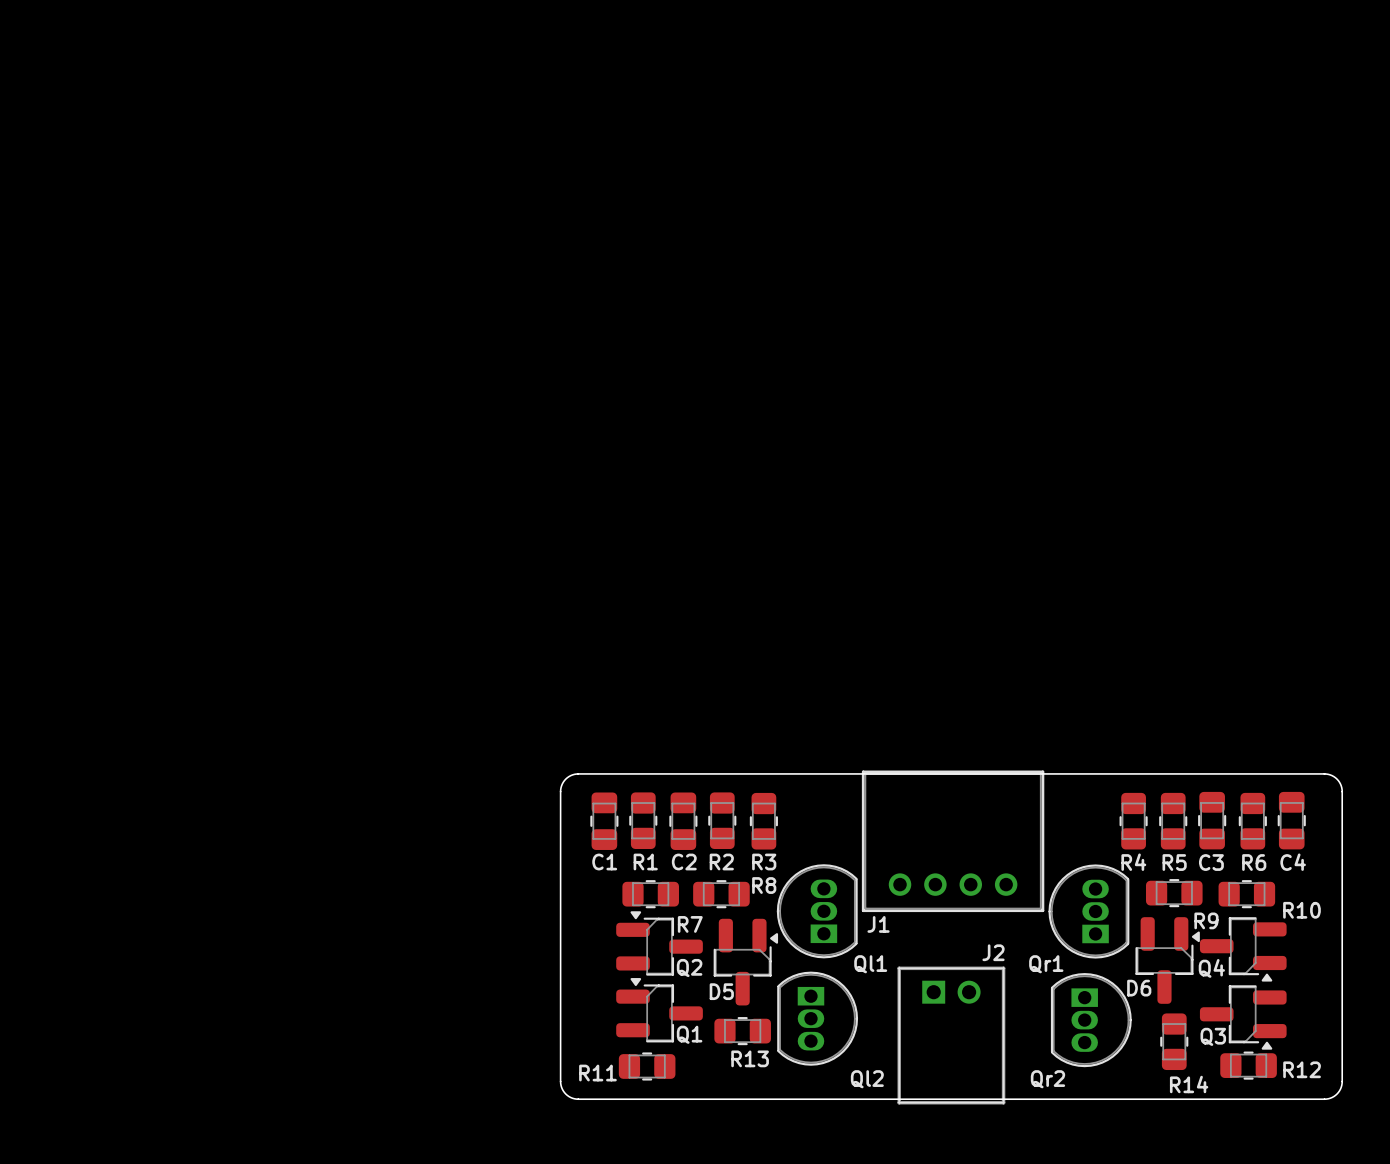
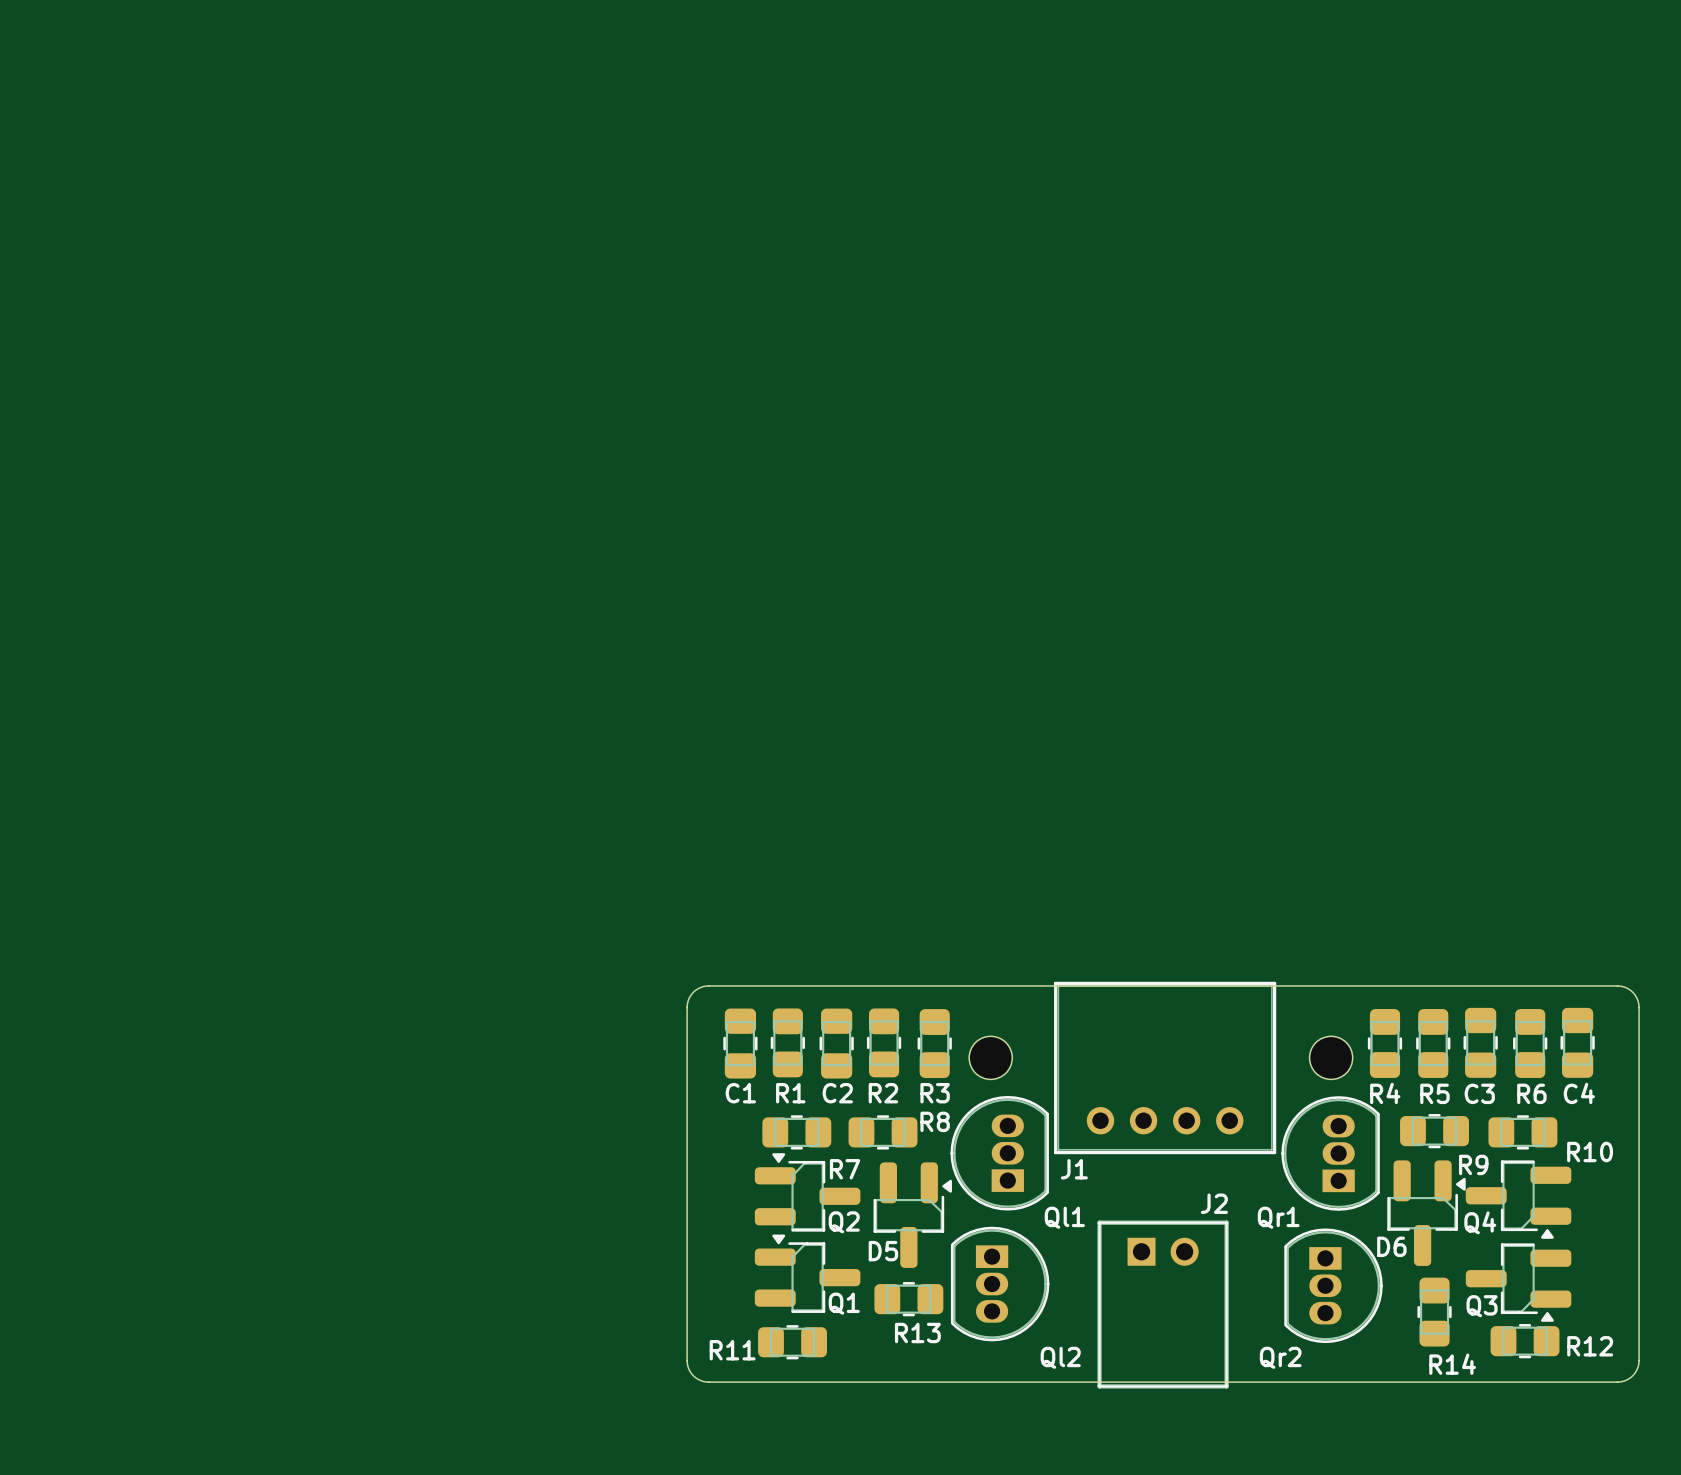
part: none -> (990, 1057)
part: none -> (1331, 1057)

